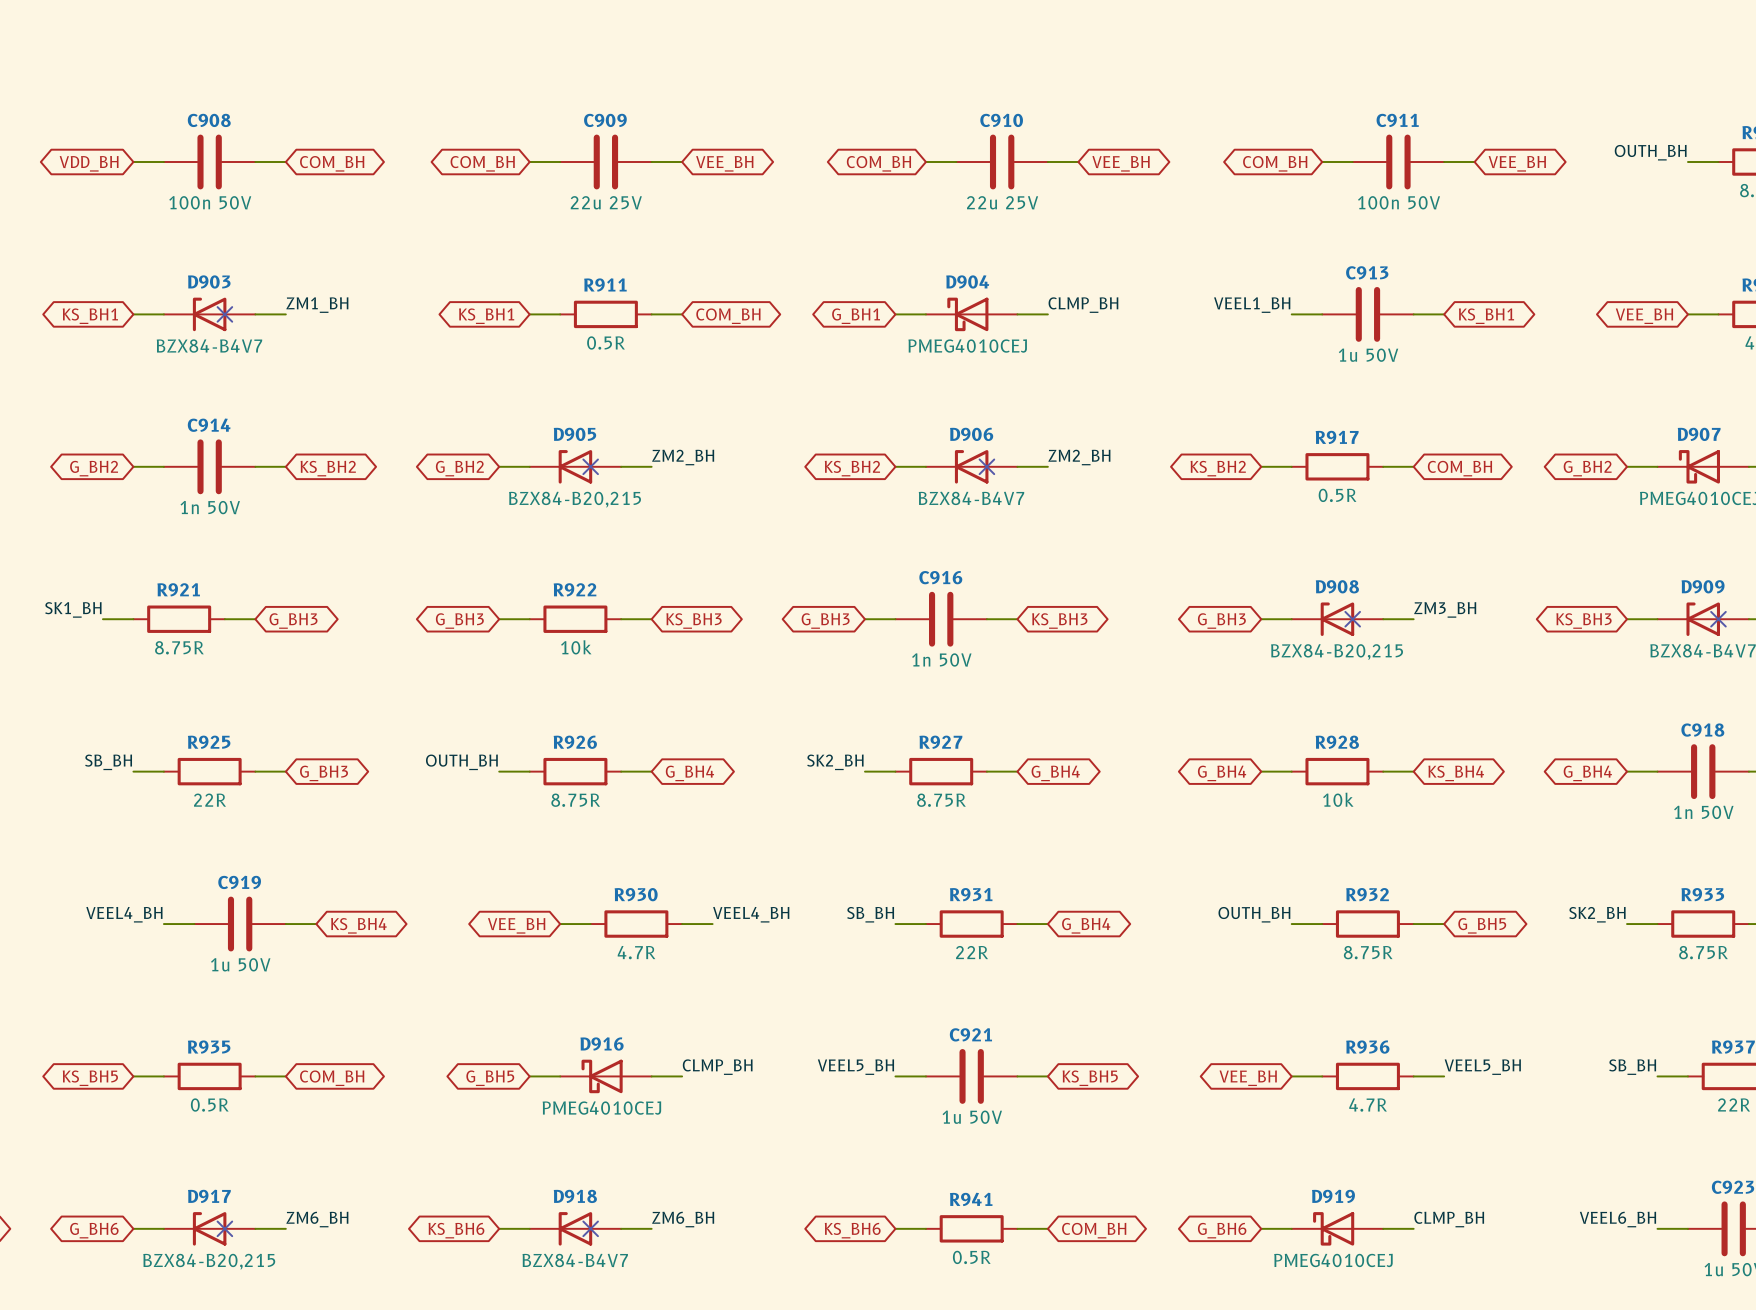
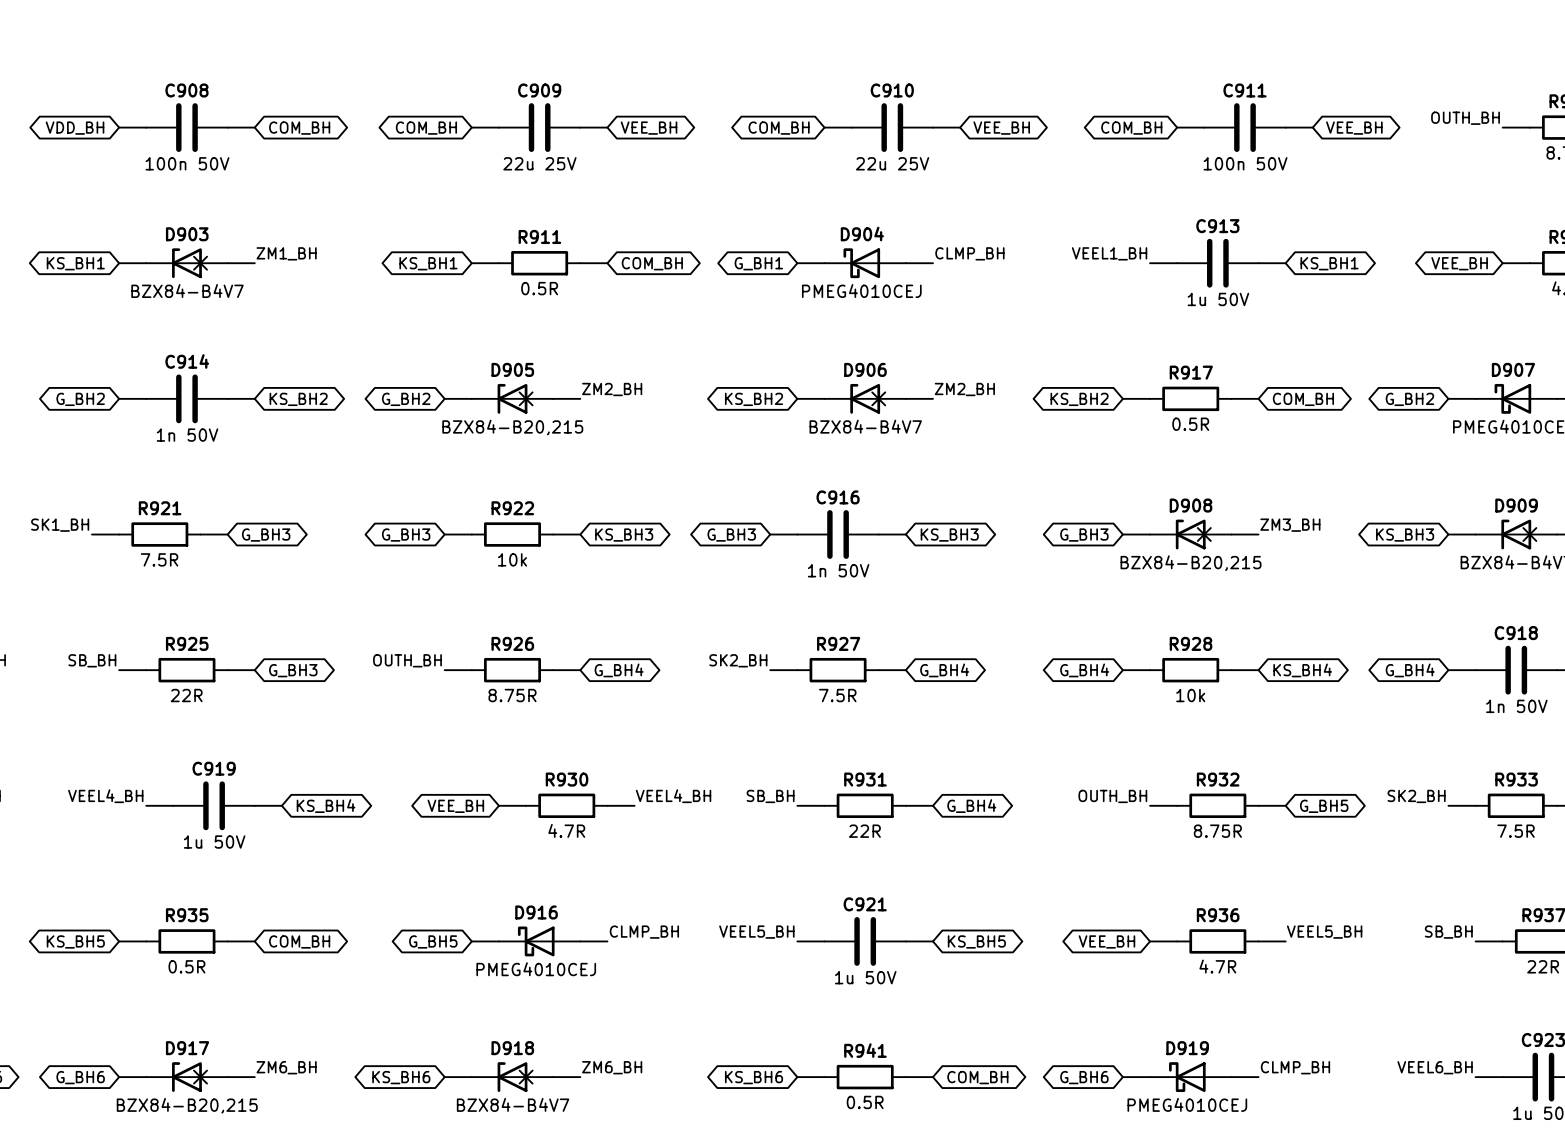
R921 value: 8.75R (179, 647) -> 7.5R (159, 559)
R927 value: 8.75R (941, 800) -> 7.5R (837, 695)
R933 value: 8.75R (1703, 952) -> 7.5R (1515, 831)

